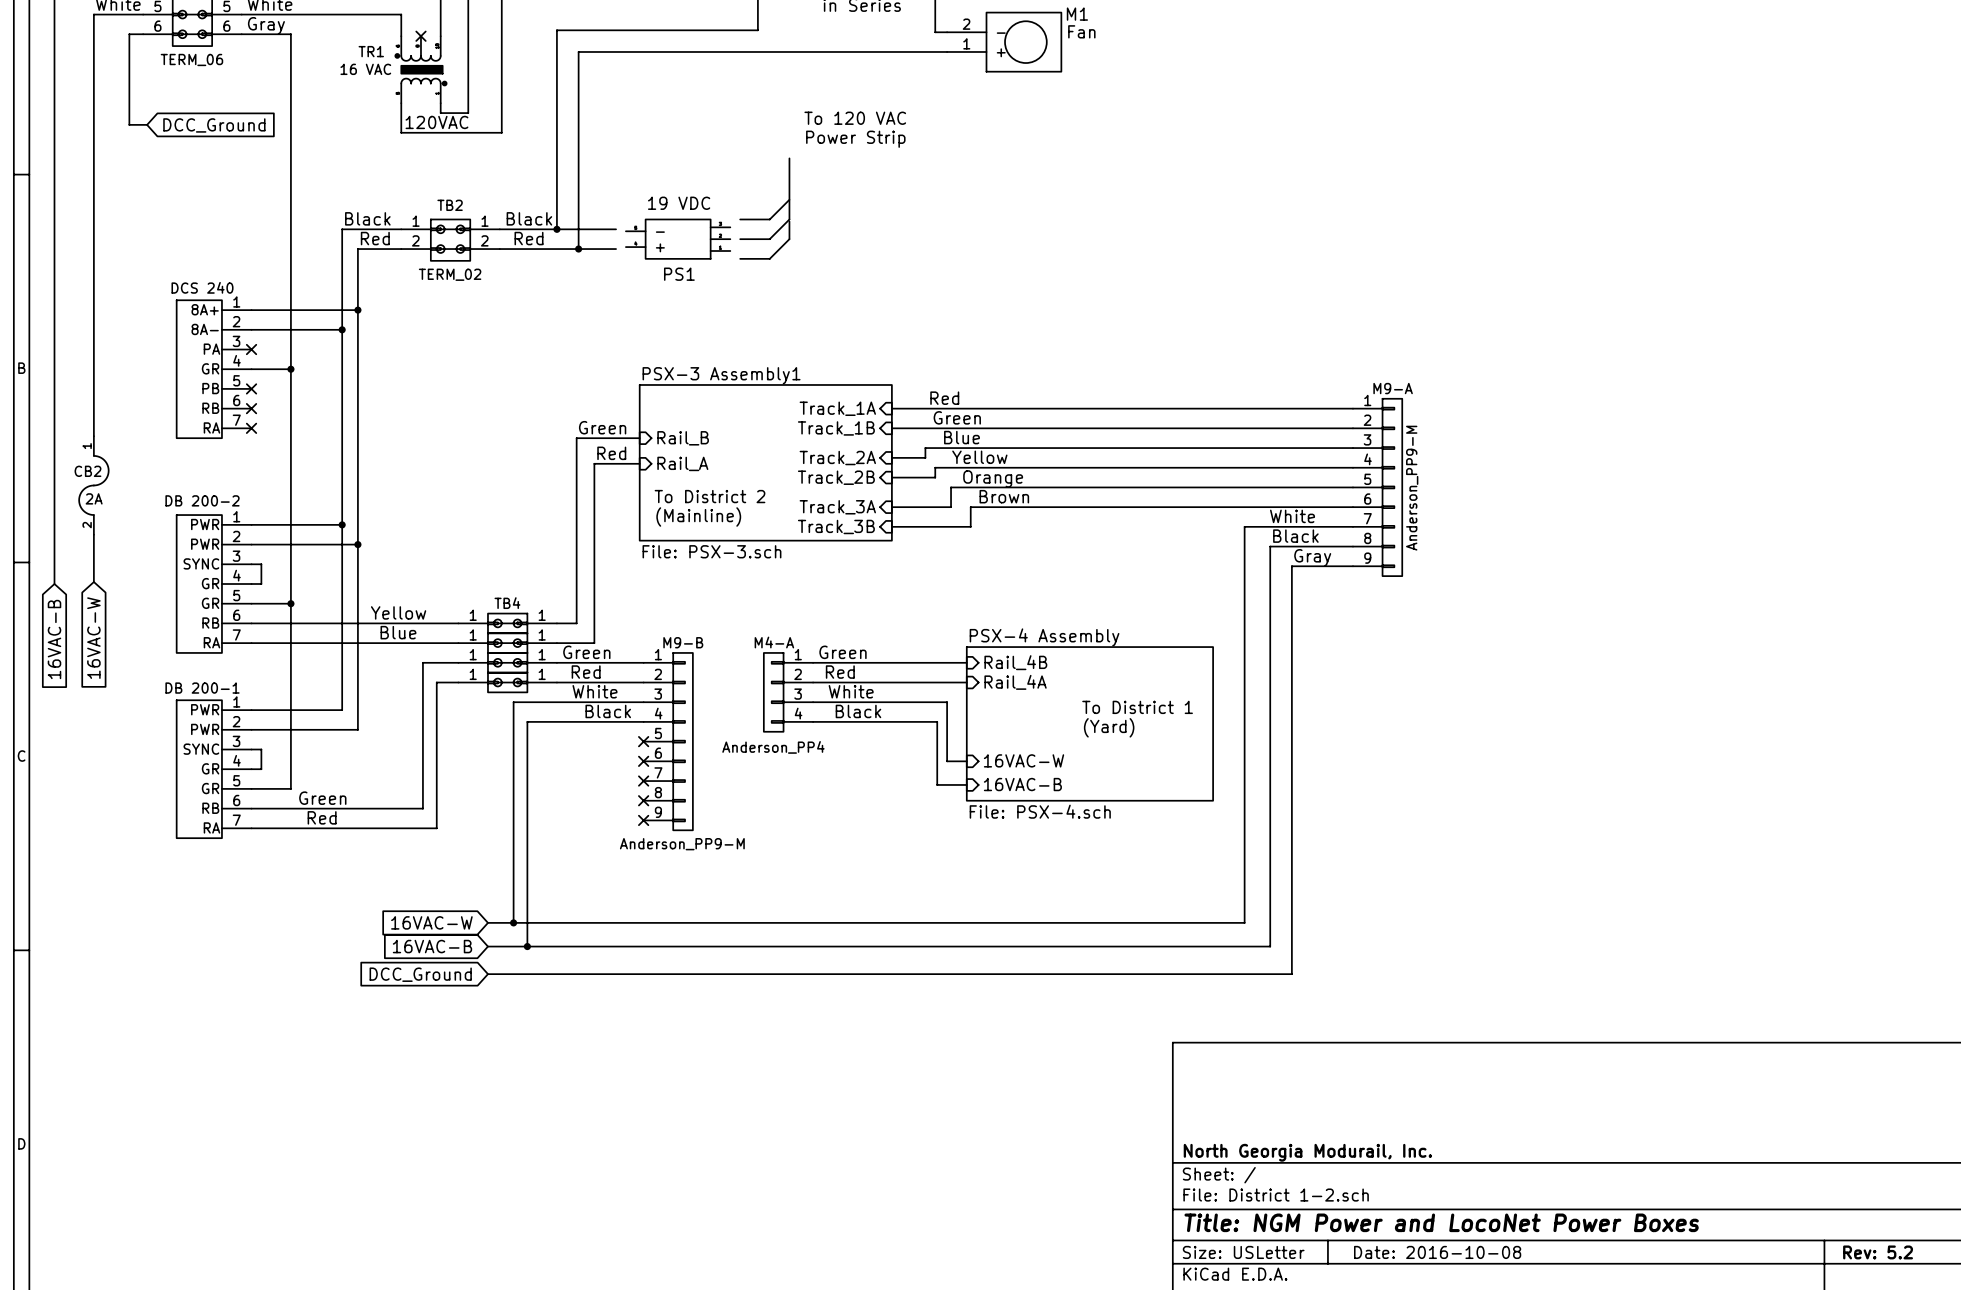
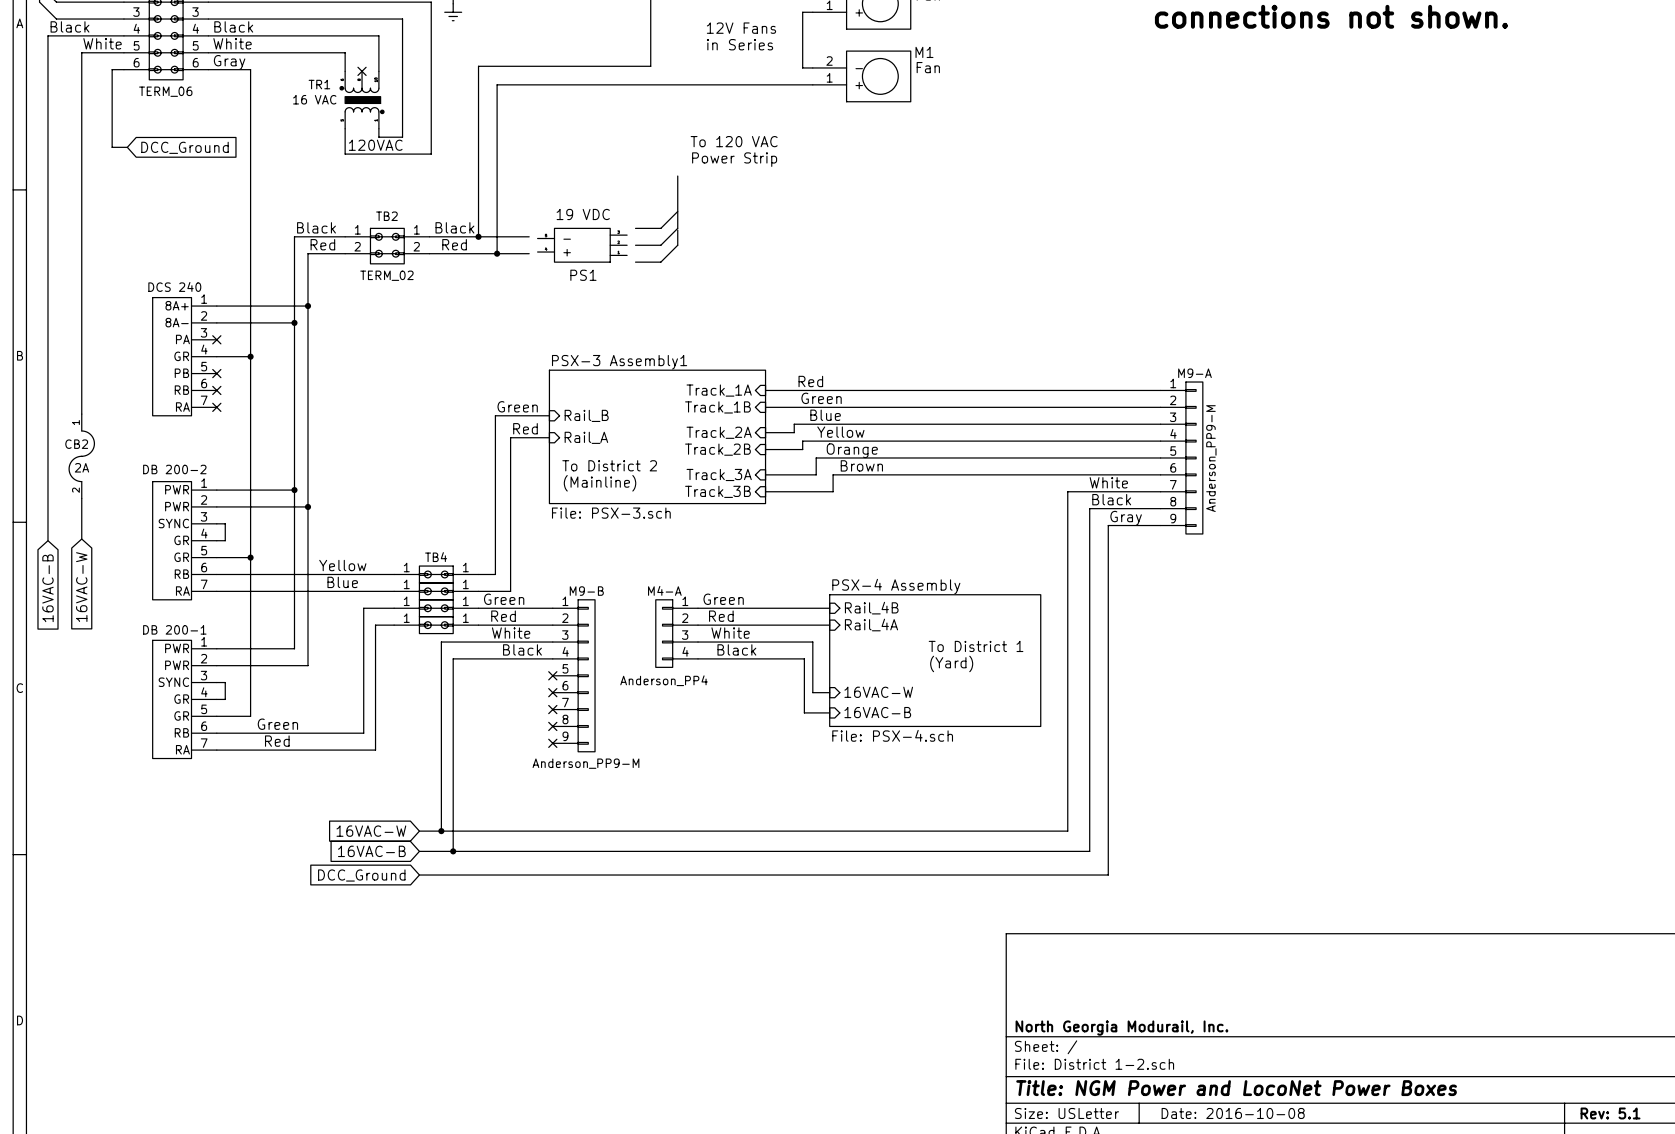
title block: Rev: 5.2 (1878, 1252) -> Rev: 5.1 (1610, 1113)

